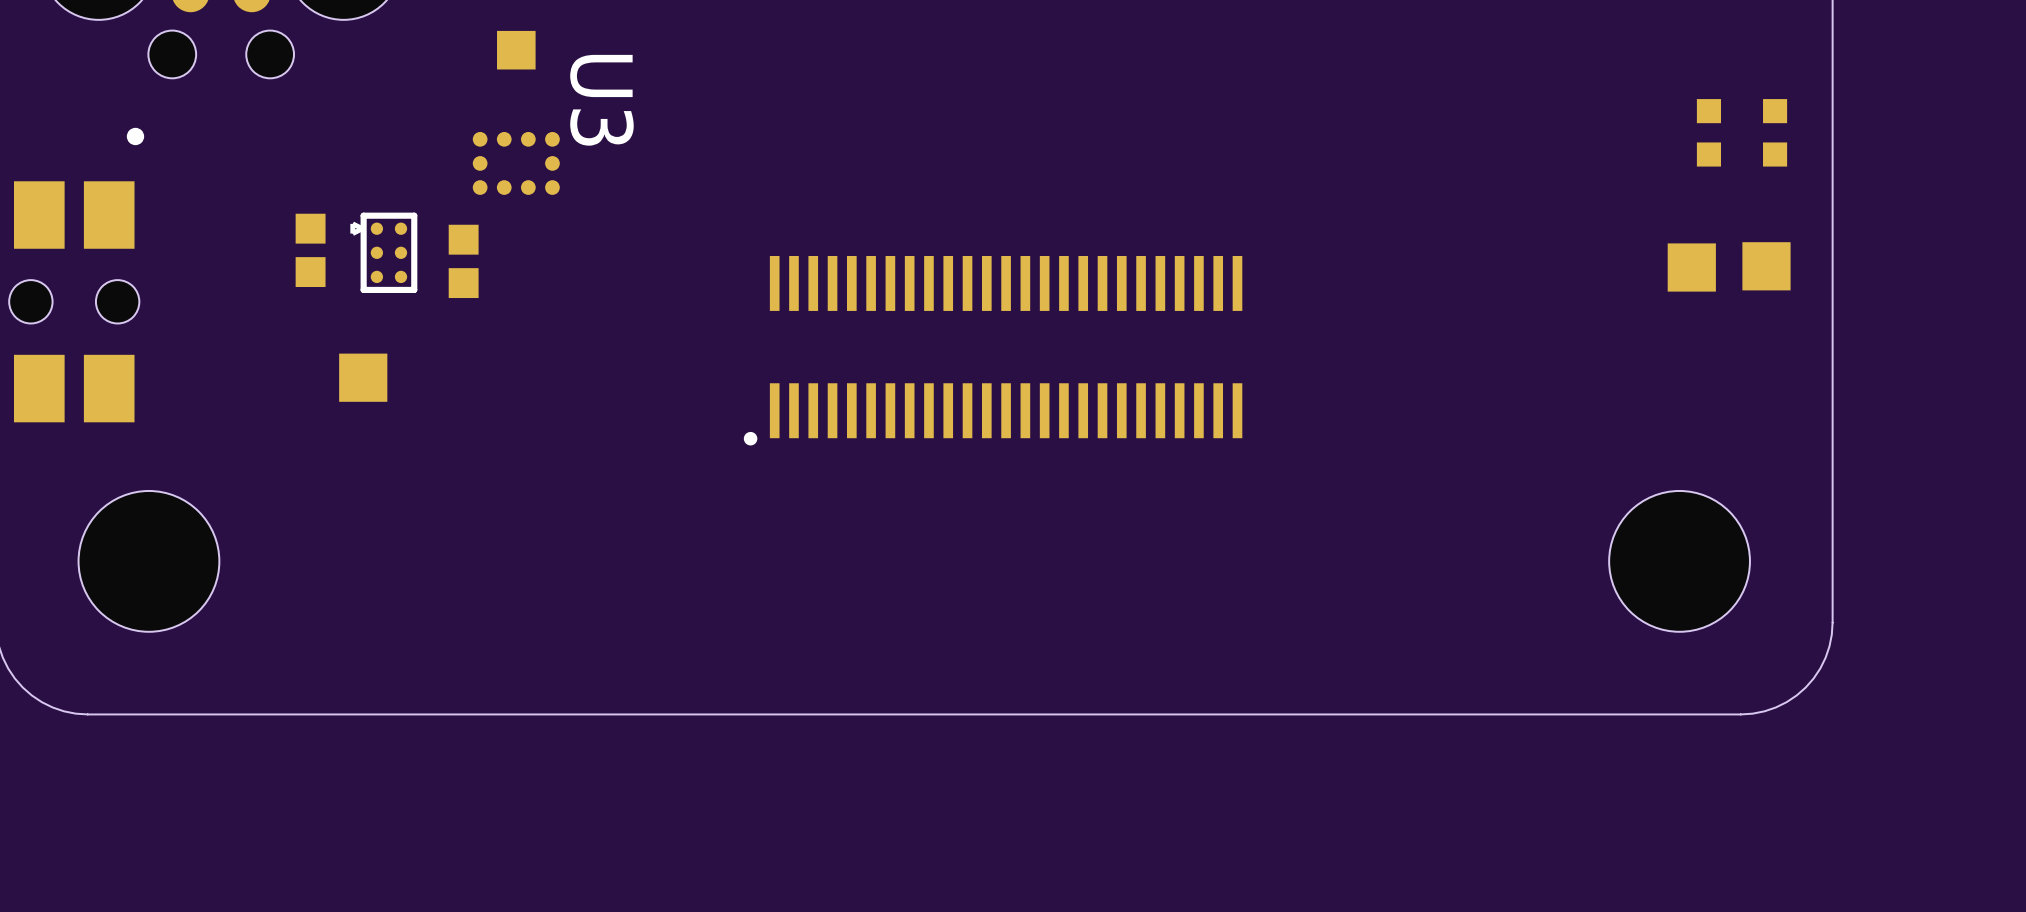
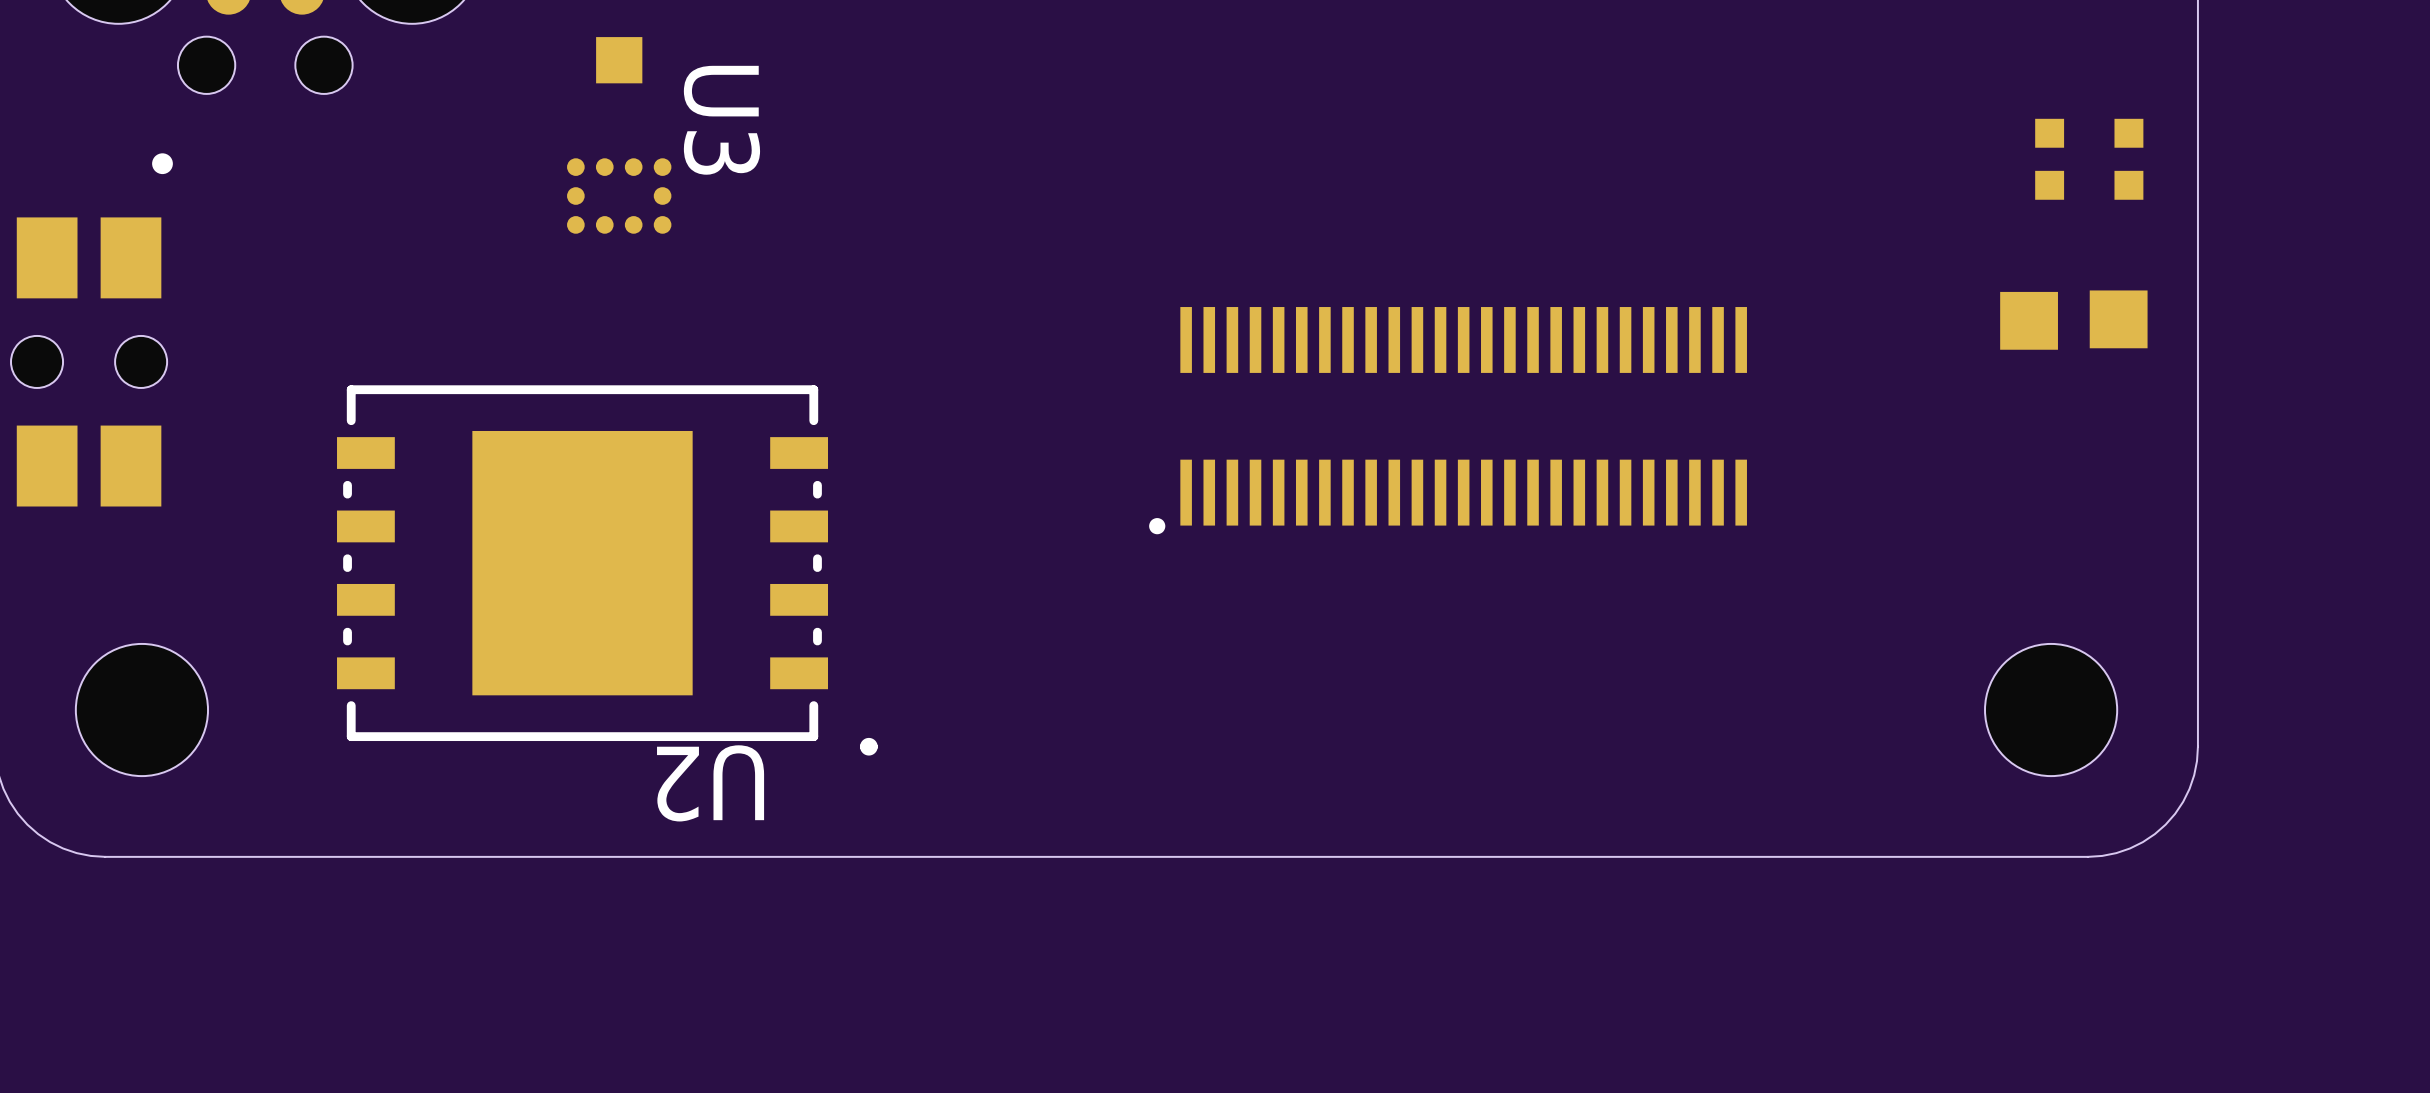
part: (310, 250) -> none
part: (383, 252) -> none
part: (463, 261) -> none
part position: (993, 350) -> (1448, 420)
part: (363, 377) -> none
U2: none -> (607, 570)
hole size: [78, 490, 220, 632] -> [75, 643, 209, 777]
hole size: [1609, 490, 1750, 632] -> [1985, 643, 2118, 777]

